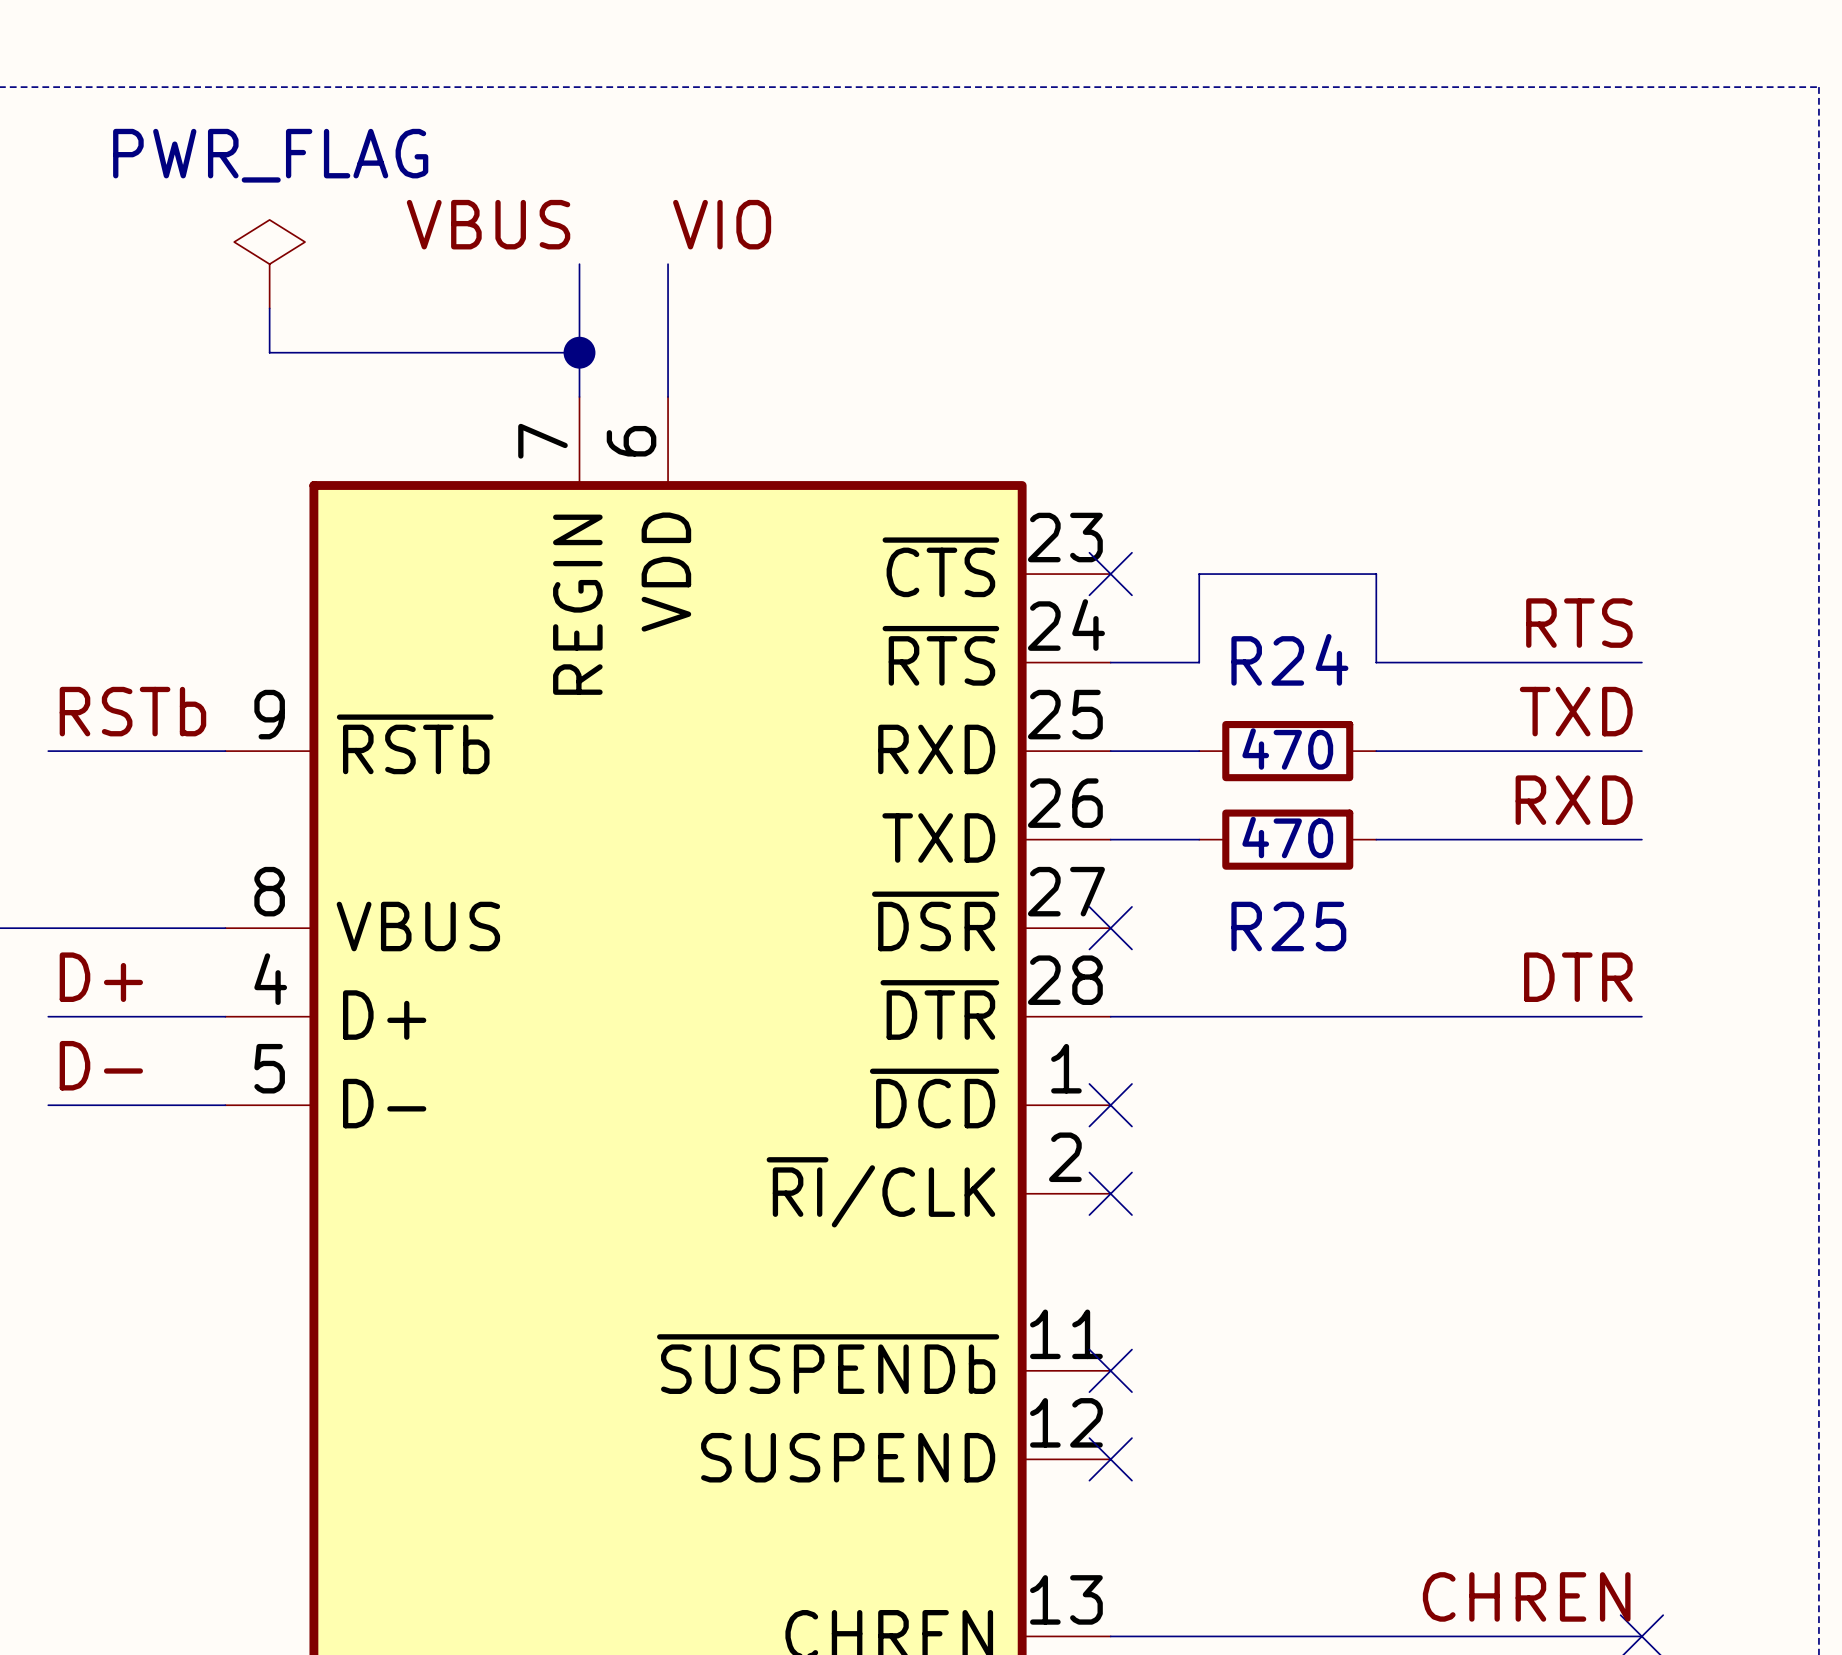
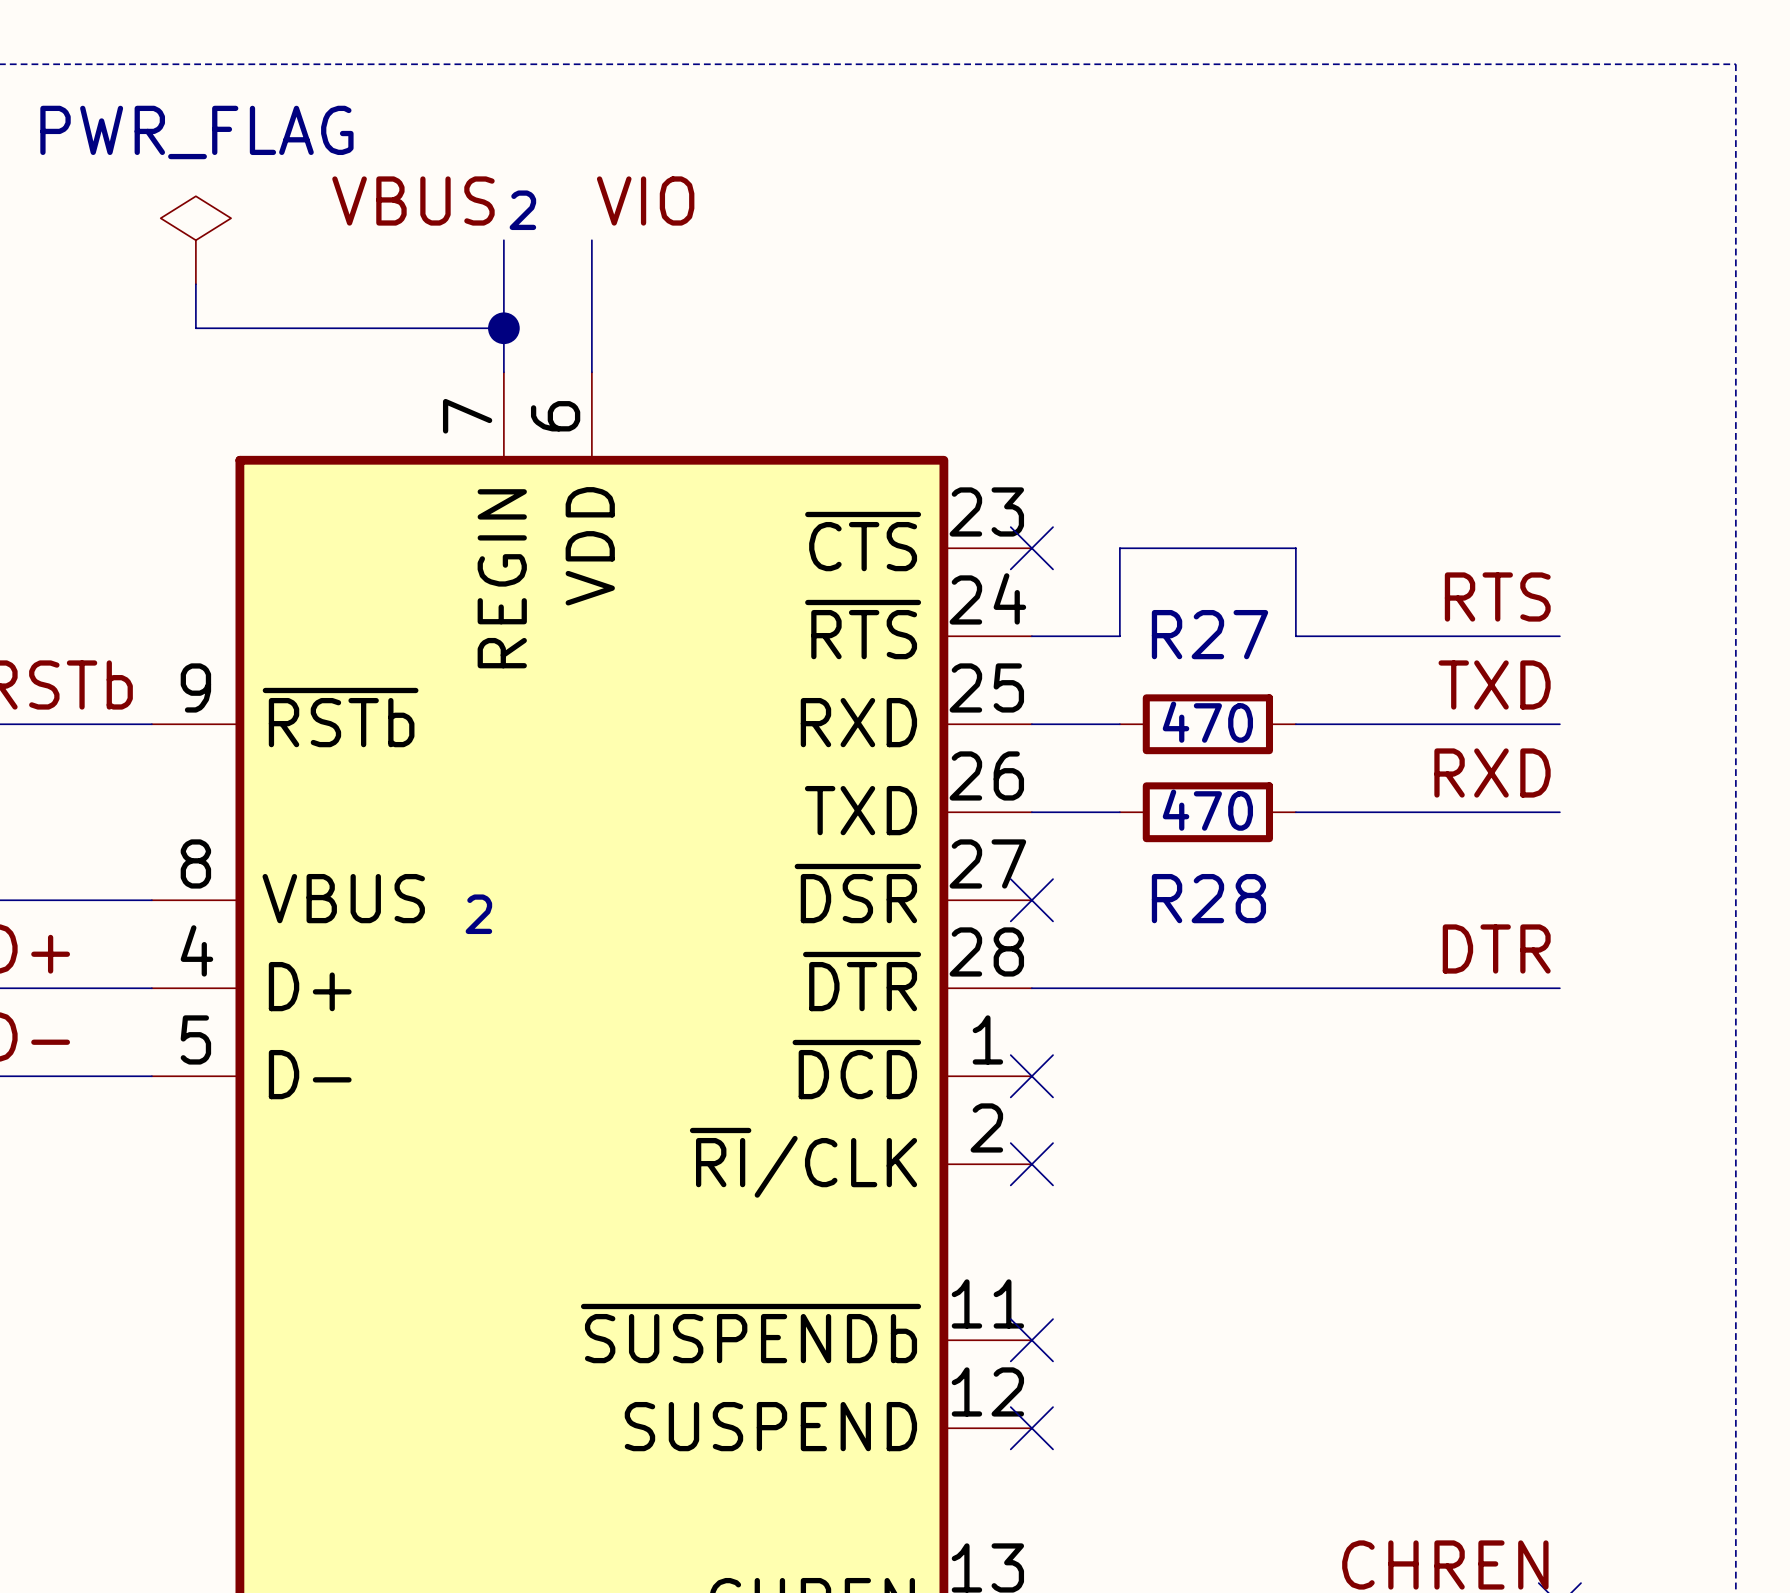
text: none -> 2 (522, 210)
R24 name: R24 (1289, 659) -> R27 (1209, 634)
R25 name: R25 (1288, 926) -> R28 (1208, 898)
text: none -> 2 (478, 914)

